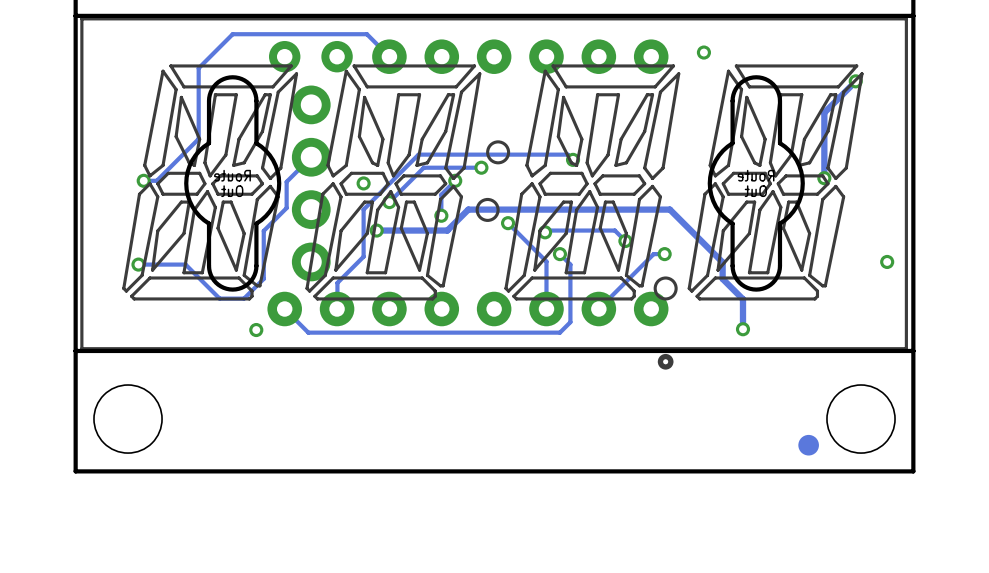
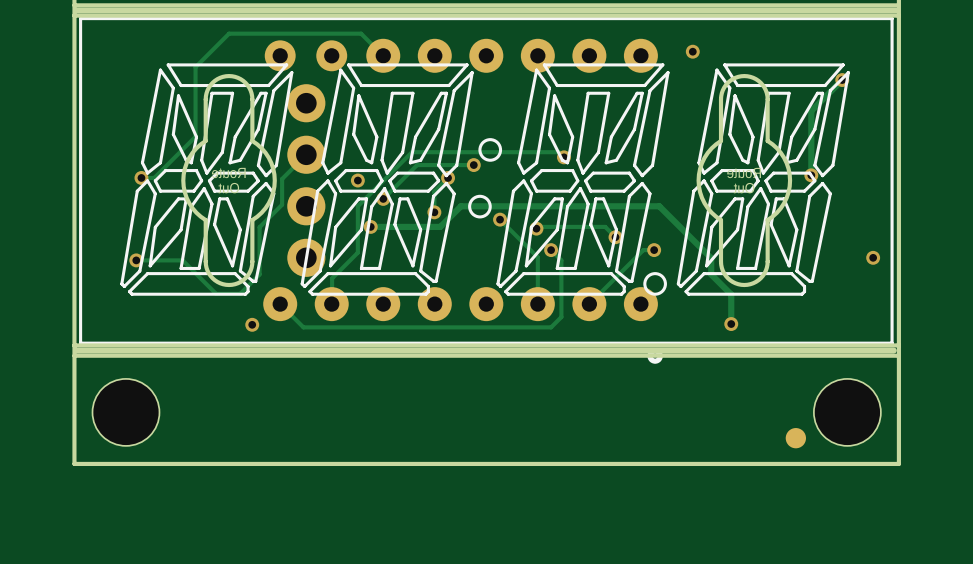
board edge: none -> (896, 5) (74, 5)
board edge: none -> (896, 10) (77, 10)
board edge: none -> (893, 350) (77, 350)
board edge: none -> (896, 355) (74, 355)

